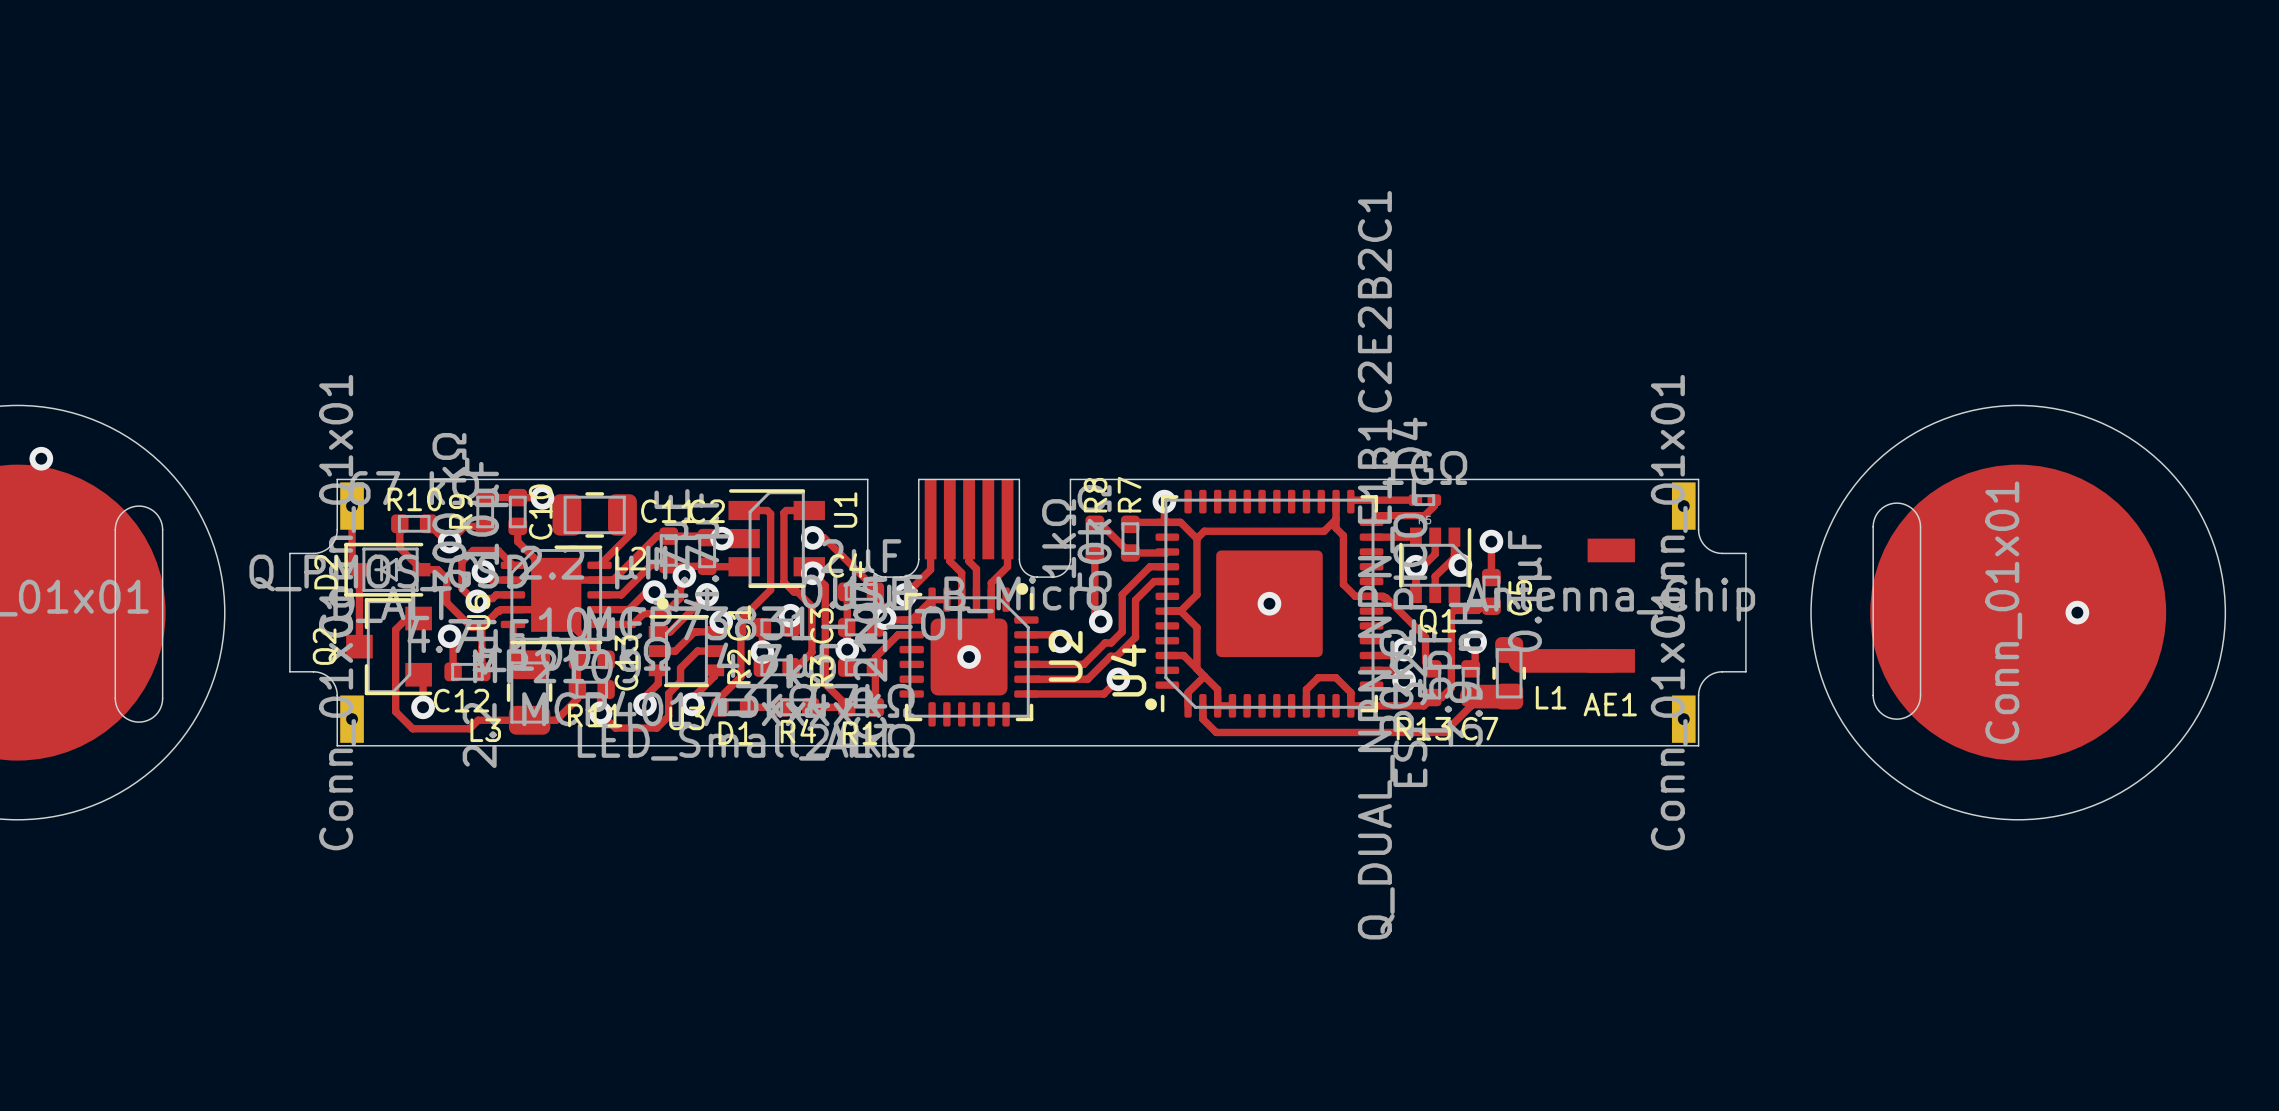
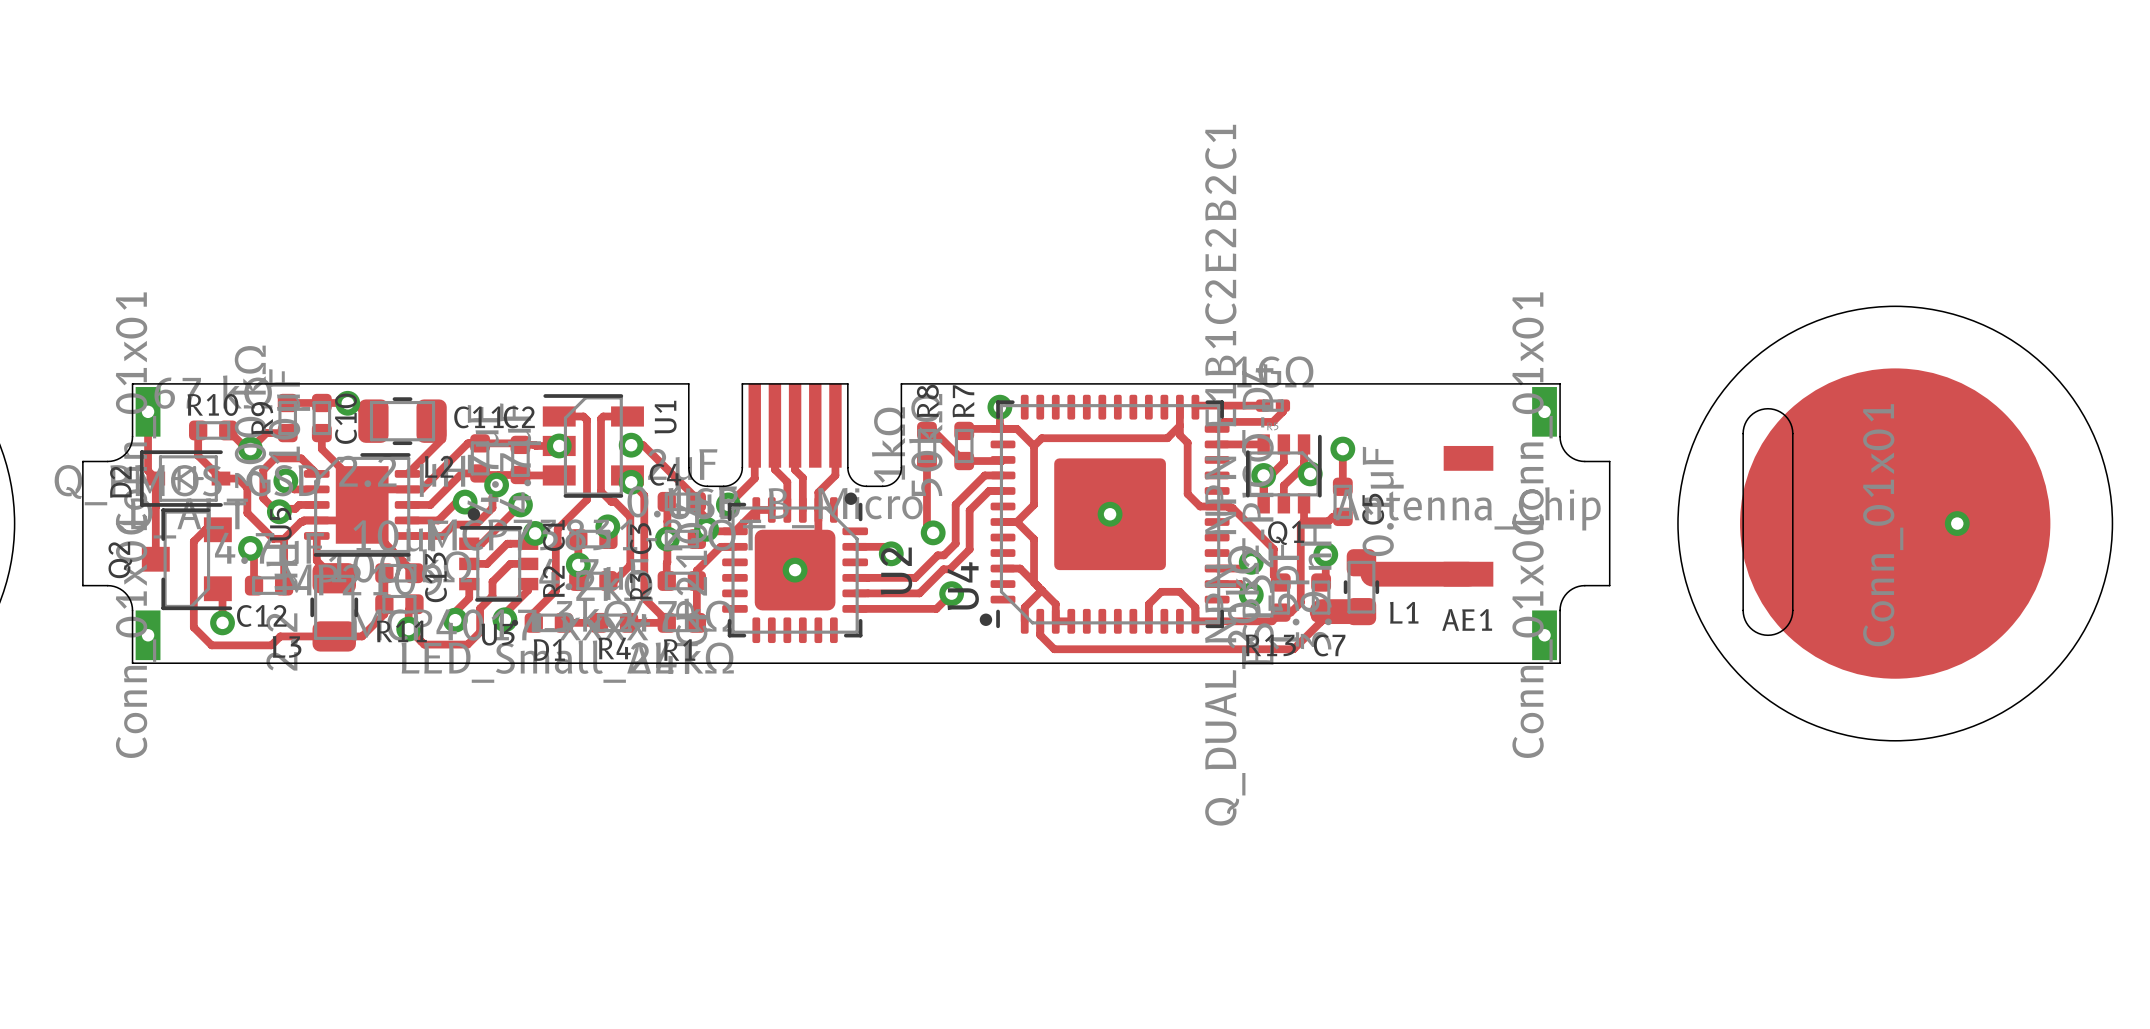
via position: (721, 538) -> (559, 445)
via position: (847, 649) -> (667, 539)

